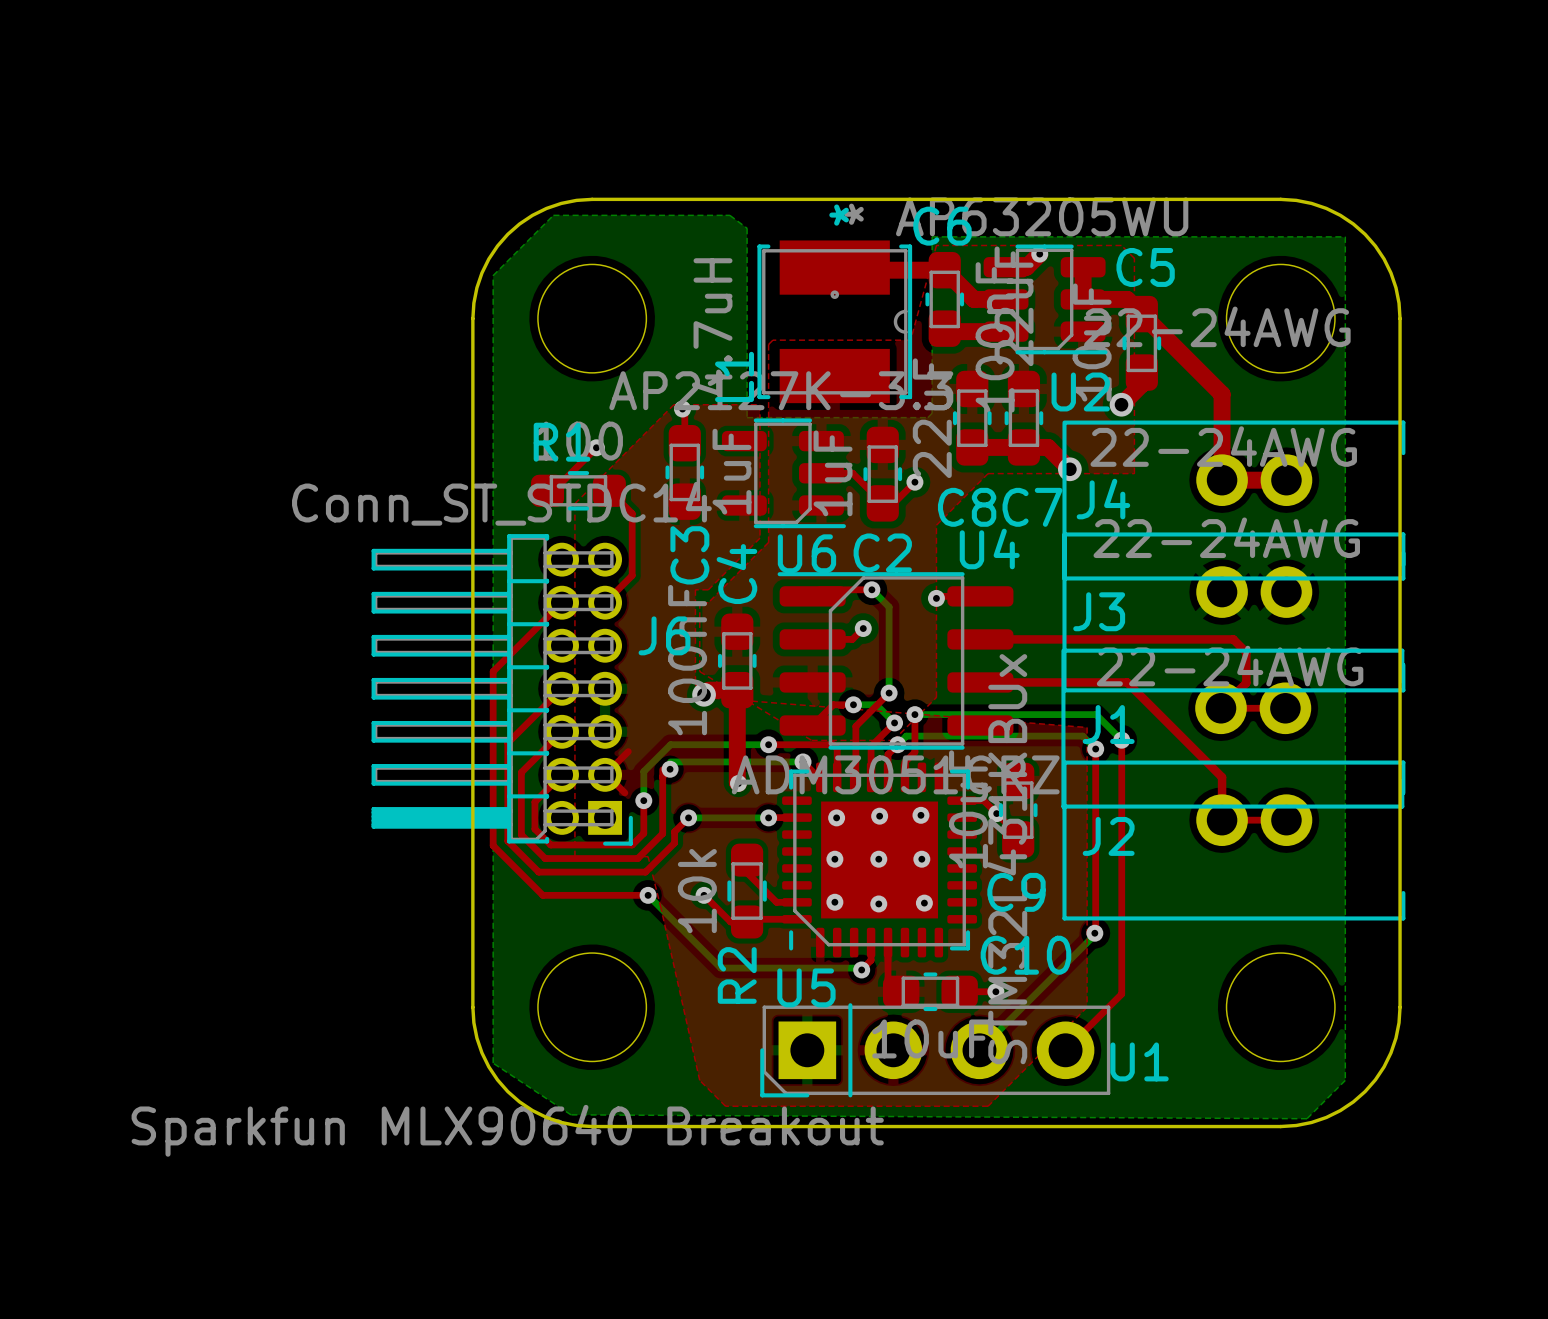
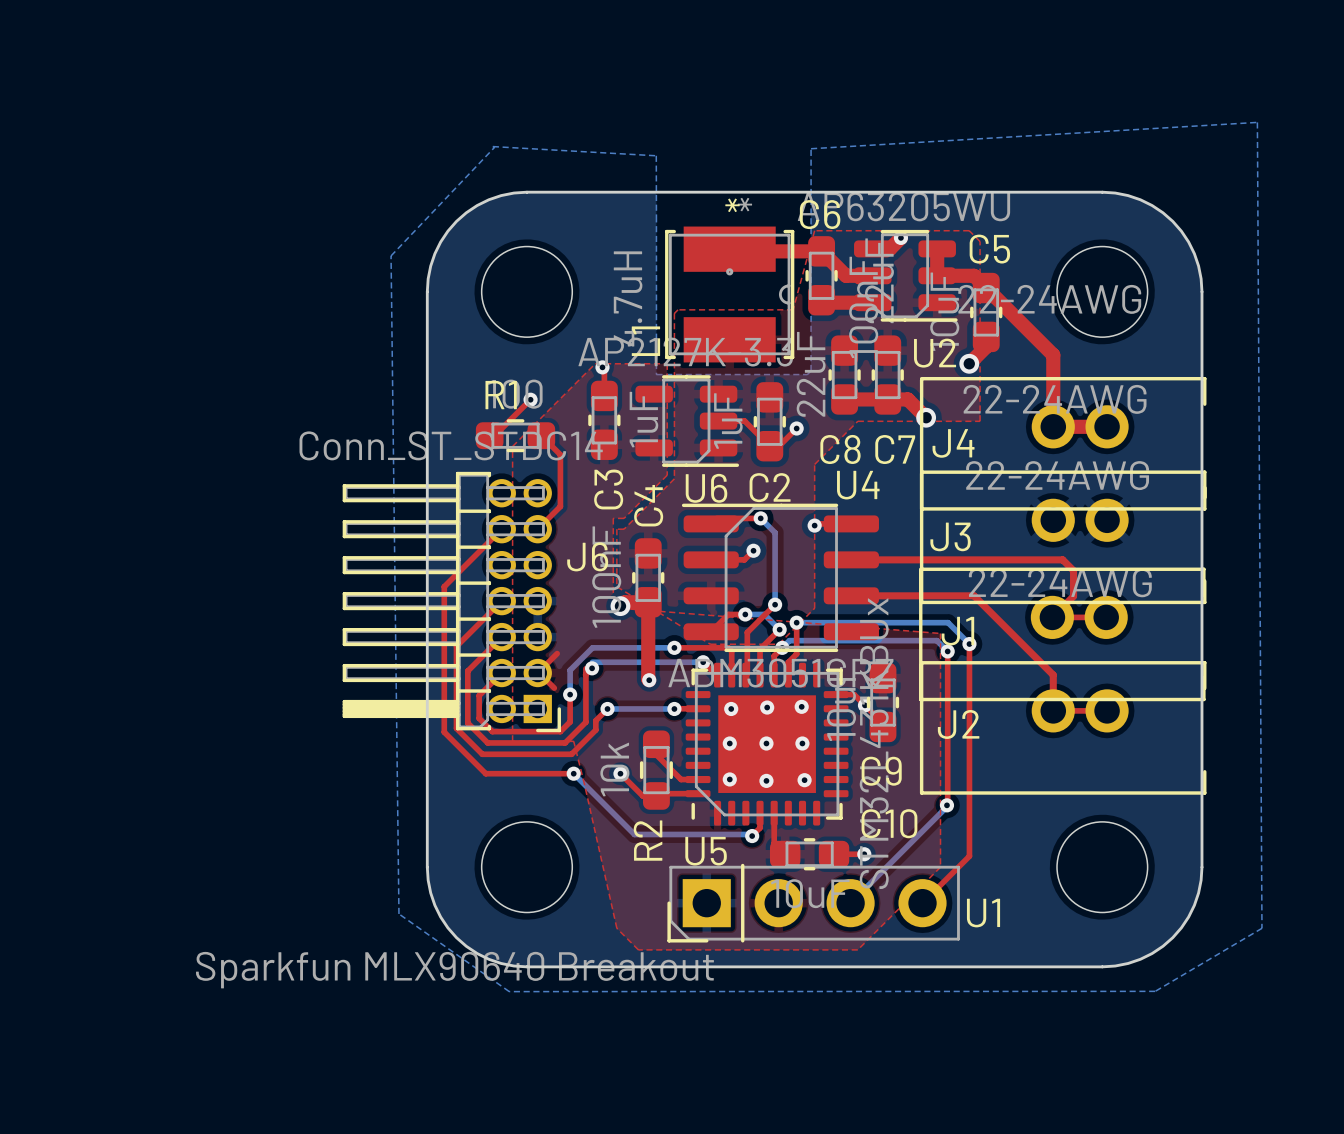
bottom zone outline: (747, 228) (729, 215) (553, 215) (493, 275) (493, 1063) (570, 1114) (1306, 1118) (1345, 1080) (1345, 236) (932, 236) -> (656, 216) (656, 155) (492, 146) (494, 147) (391, 255) (398, 913) (509, 991) (1155, 991) (1261, 928) (1257, 122) (811, 148) (811, 223)

